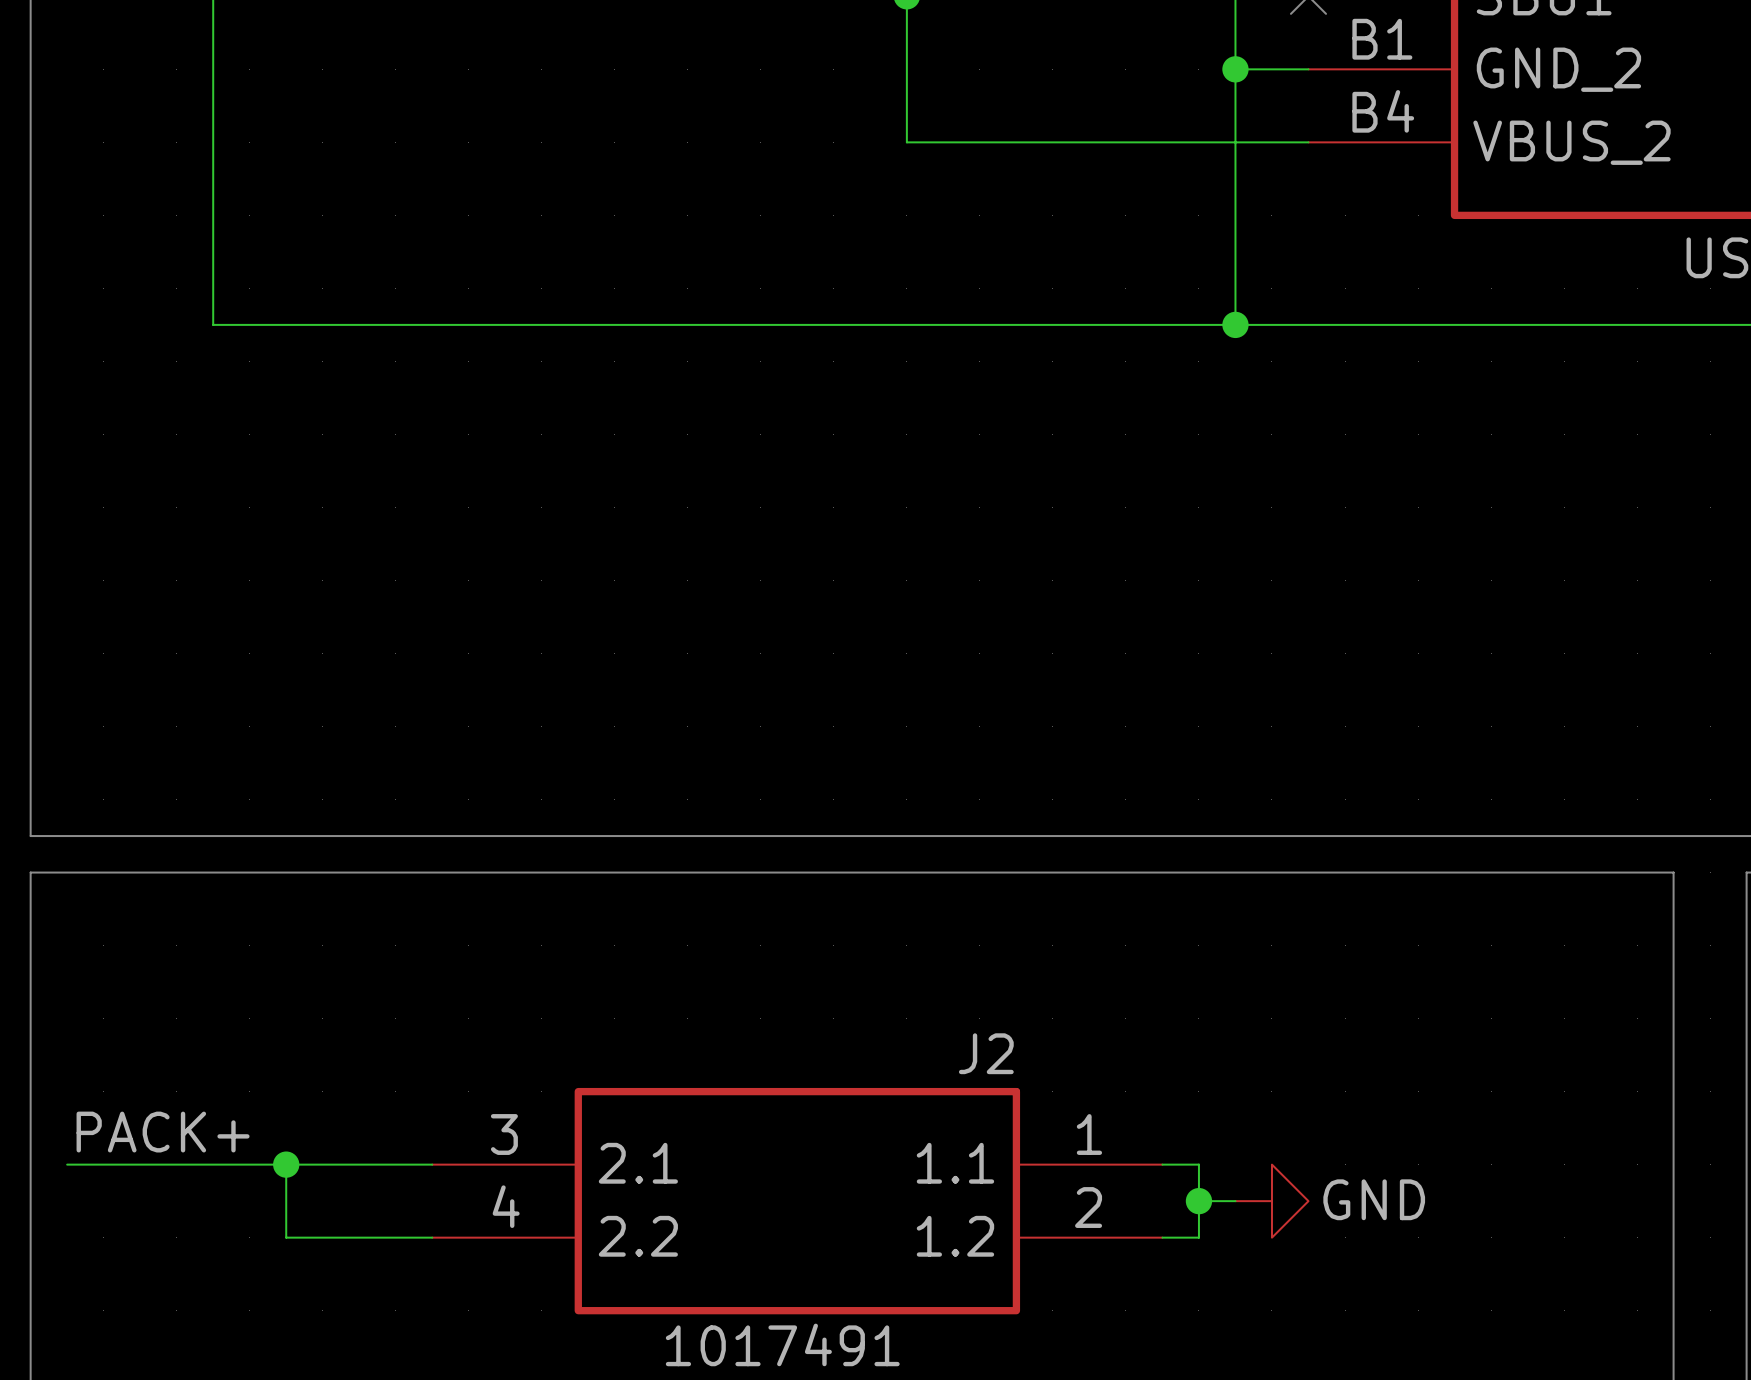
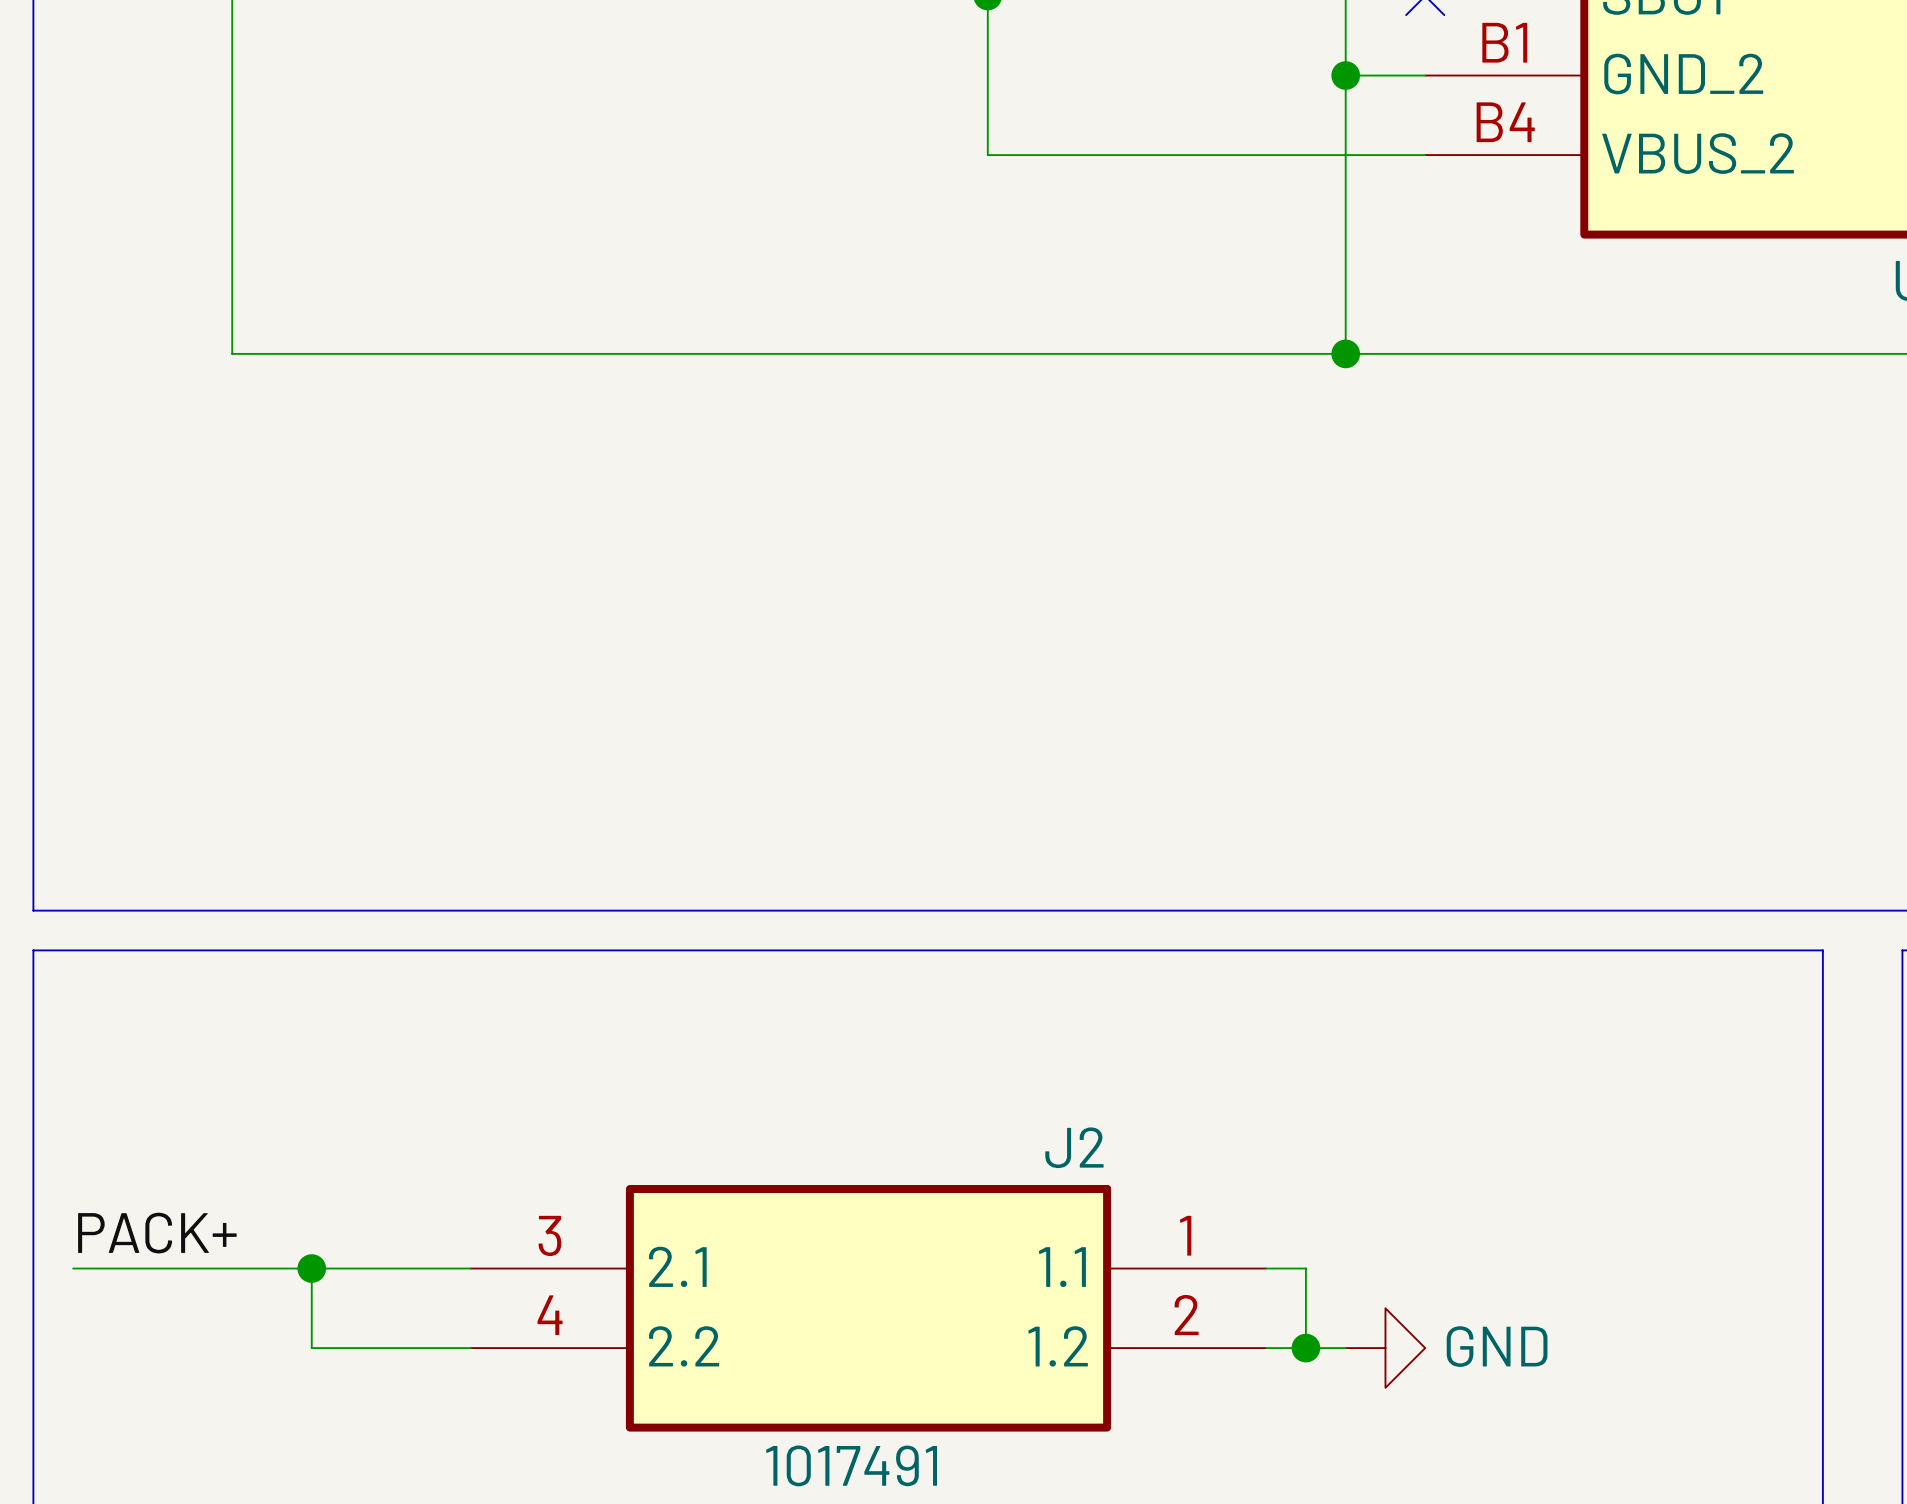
wire: (1198, 1201) (1235, 1201) -> (1305, 1348) (1345, 1348)
junction position: (1198, 1201) -> (1305, 1348)
power symbol position: GND (1271, 1201) -> GND (1385, 1348)

